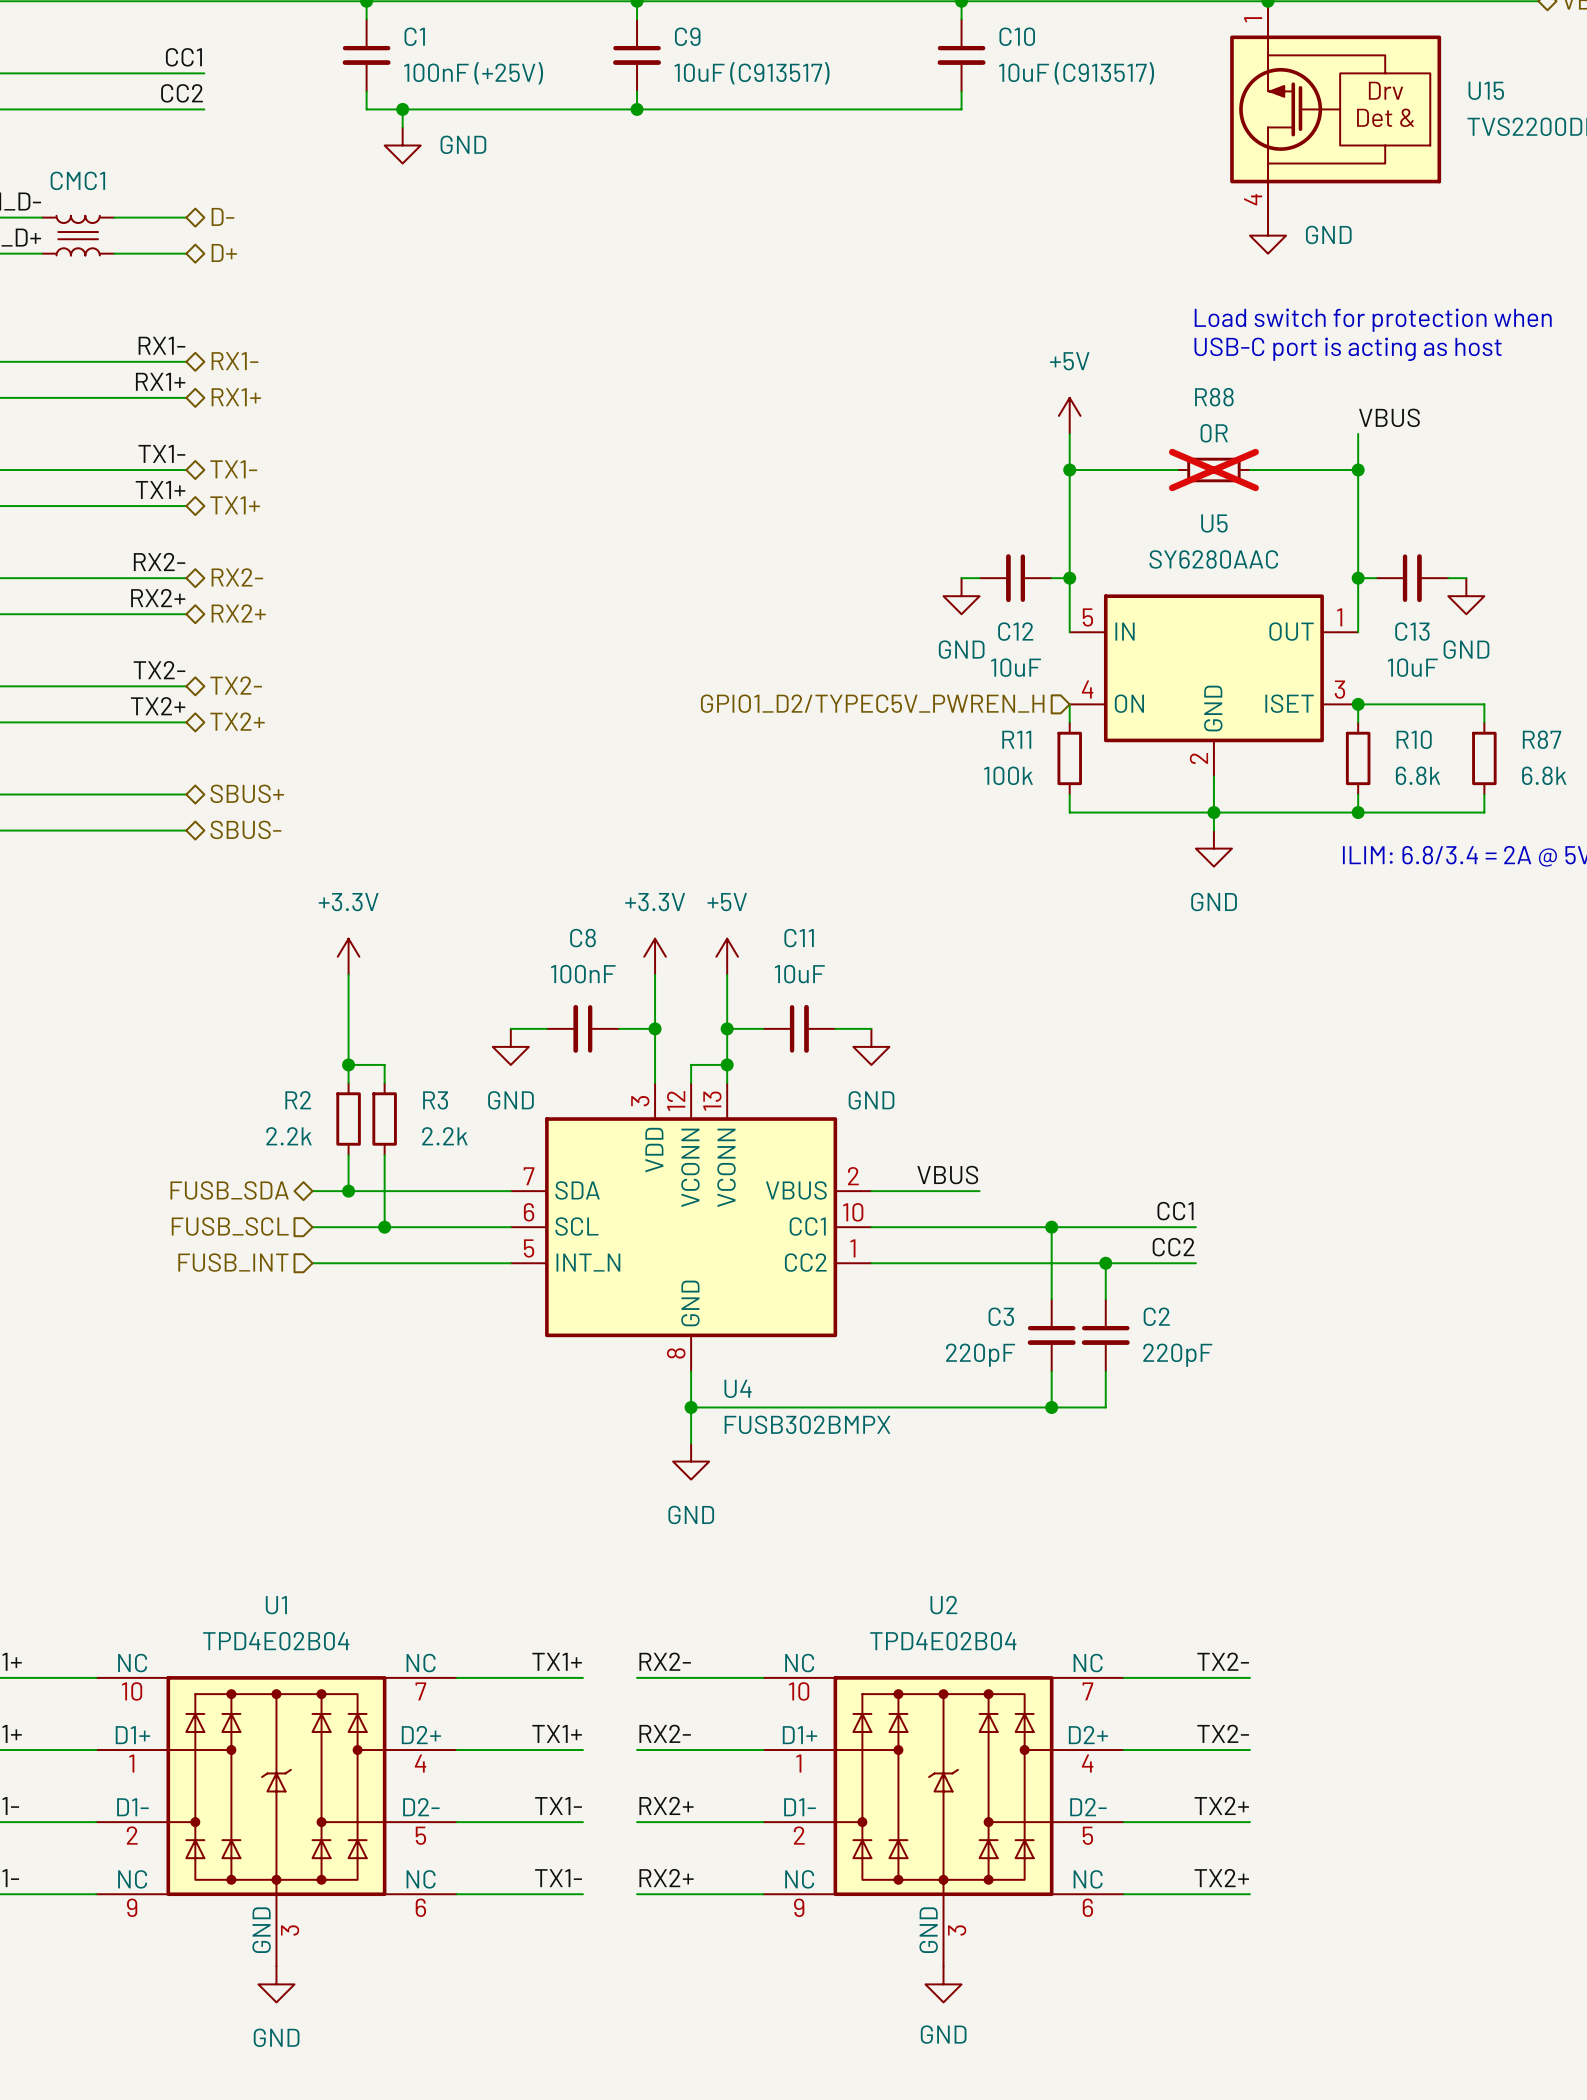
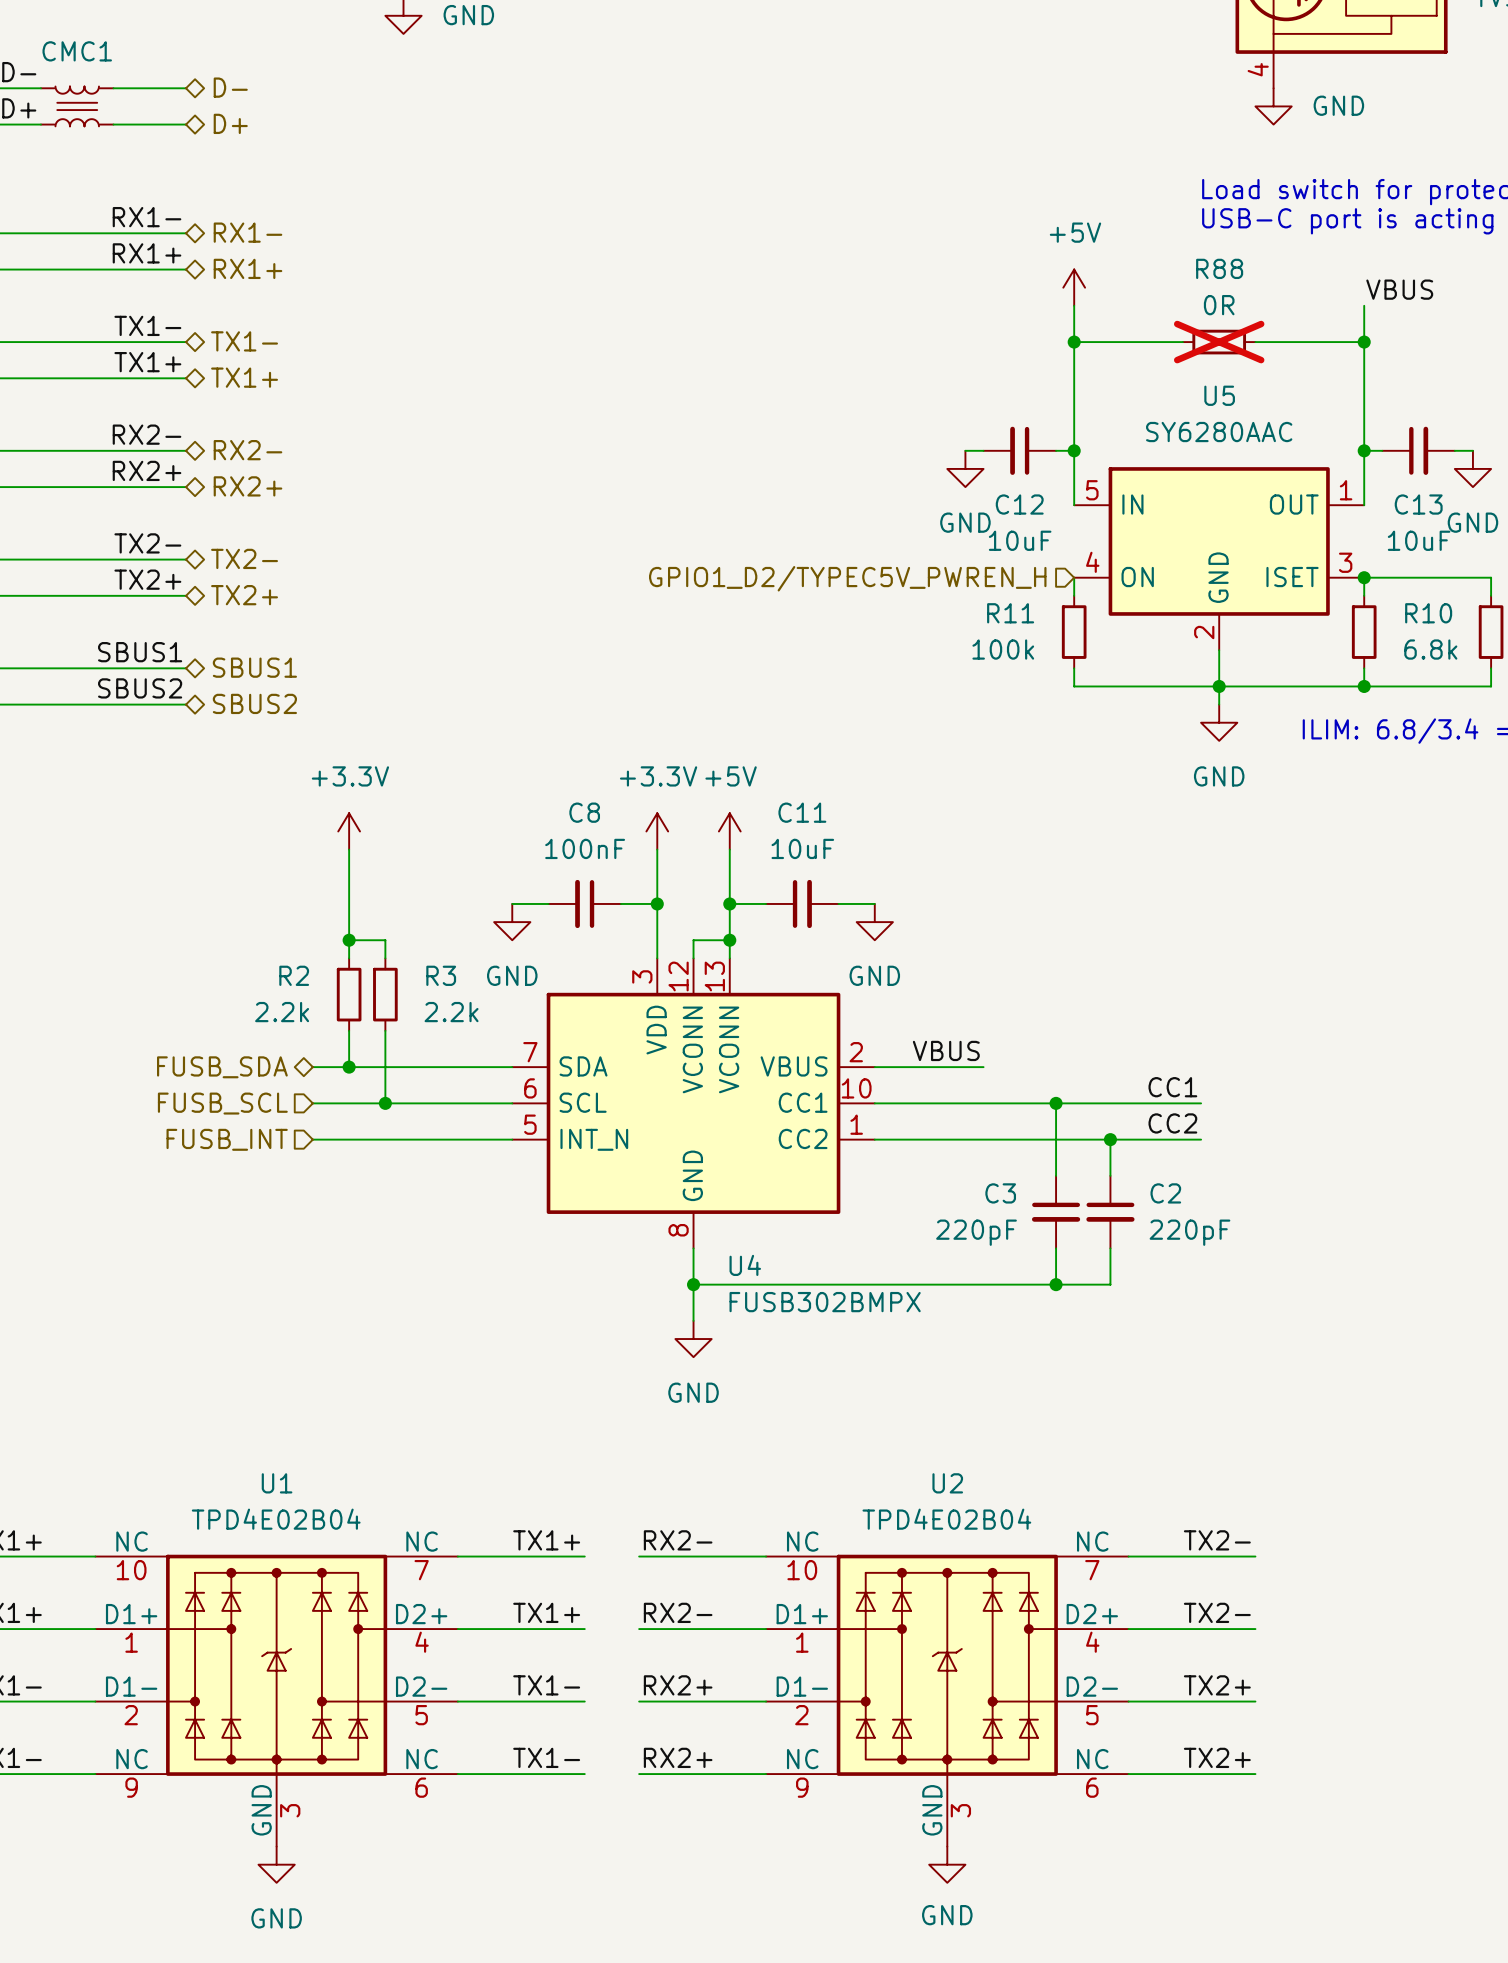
label: none -> SBUS1 (140, 652)
hierarchical label: SBUS+ (247, 793) -> SBUS1 (254, 667)
label: none -> SBUS2 (140, 688)
hierarchical label: SBUS- (245, 829) -> SBUS2 (254, 703)

